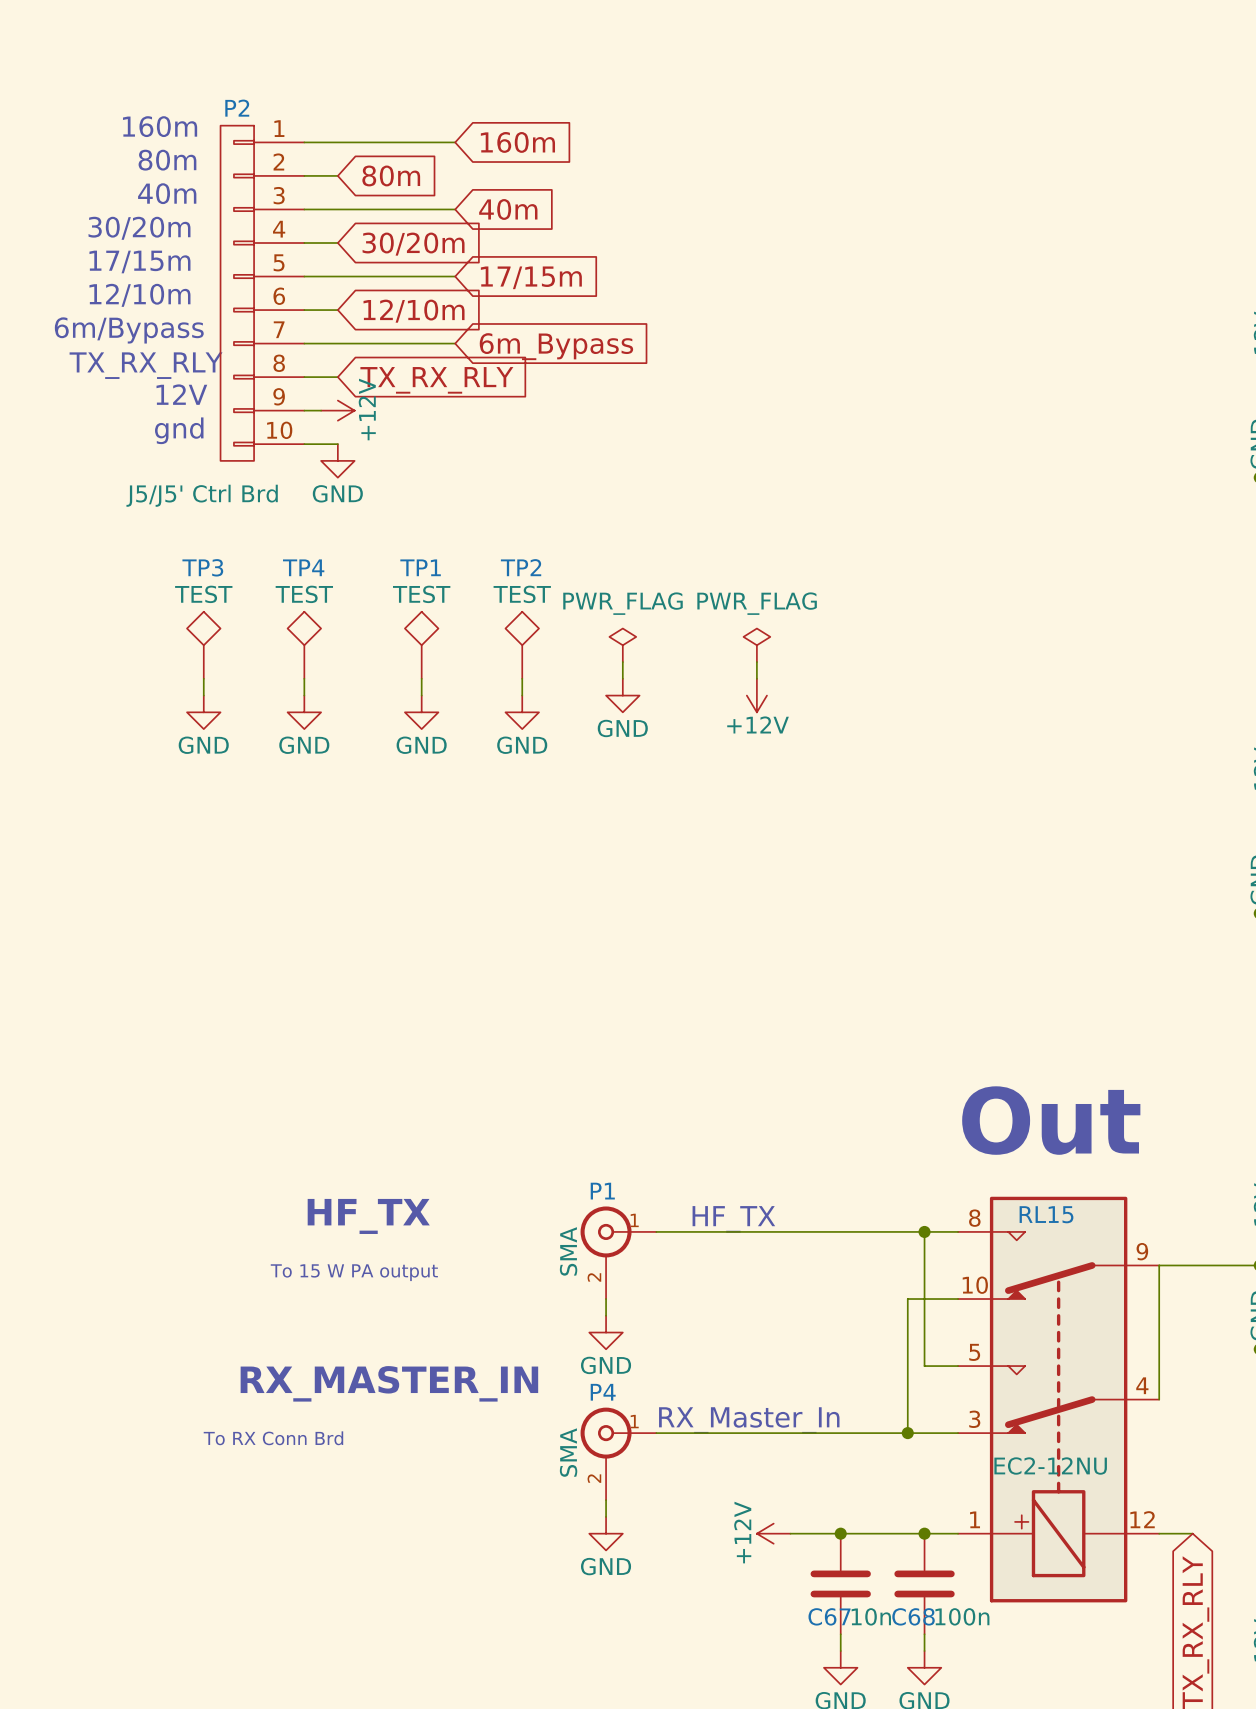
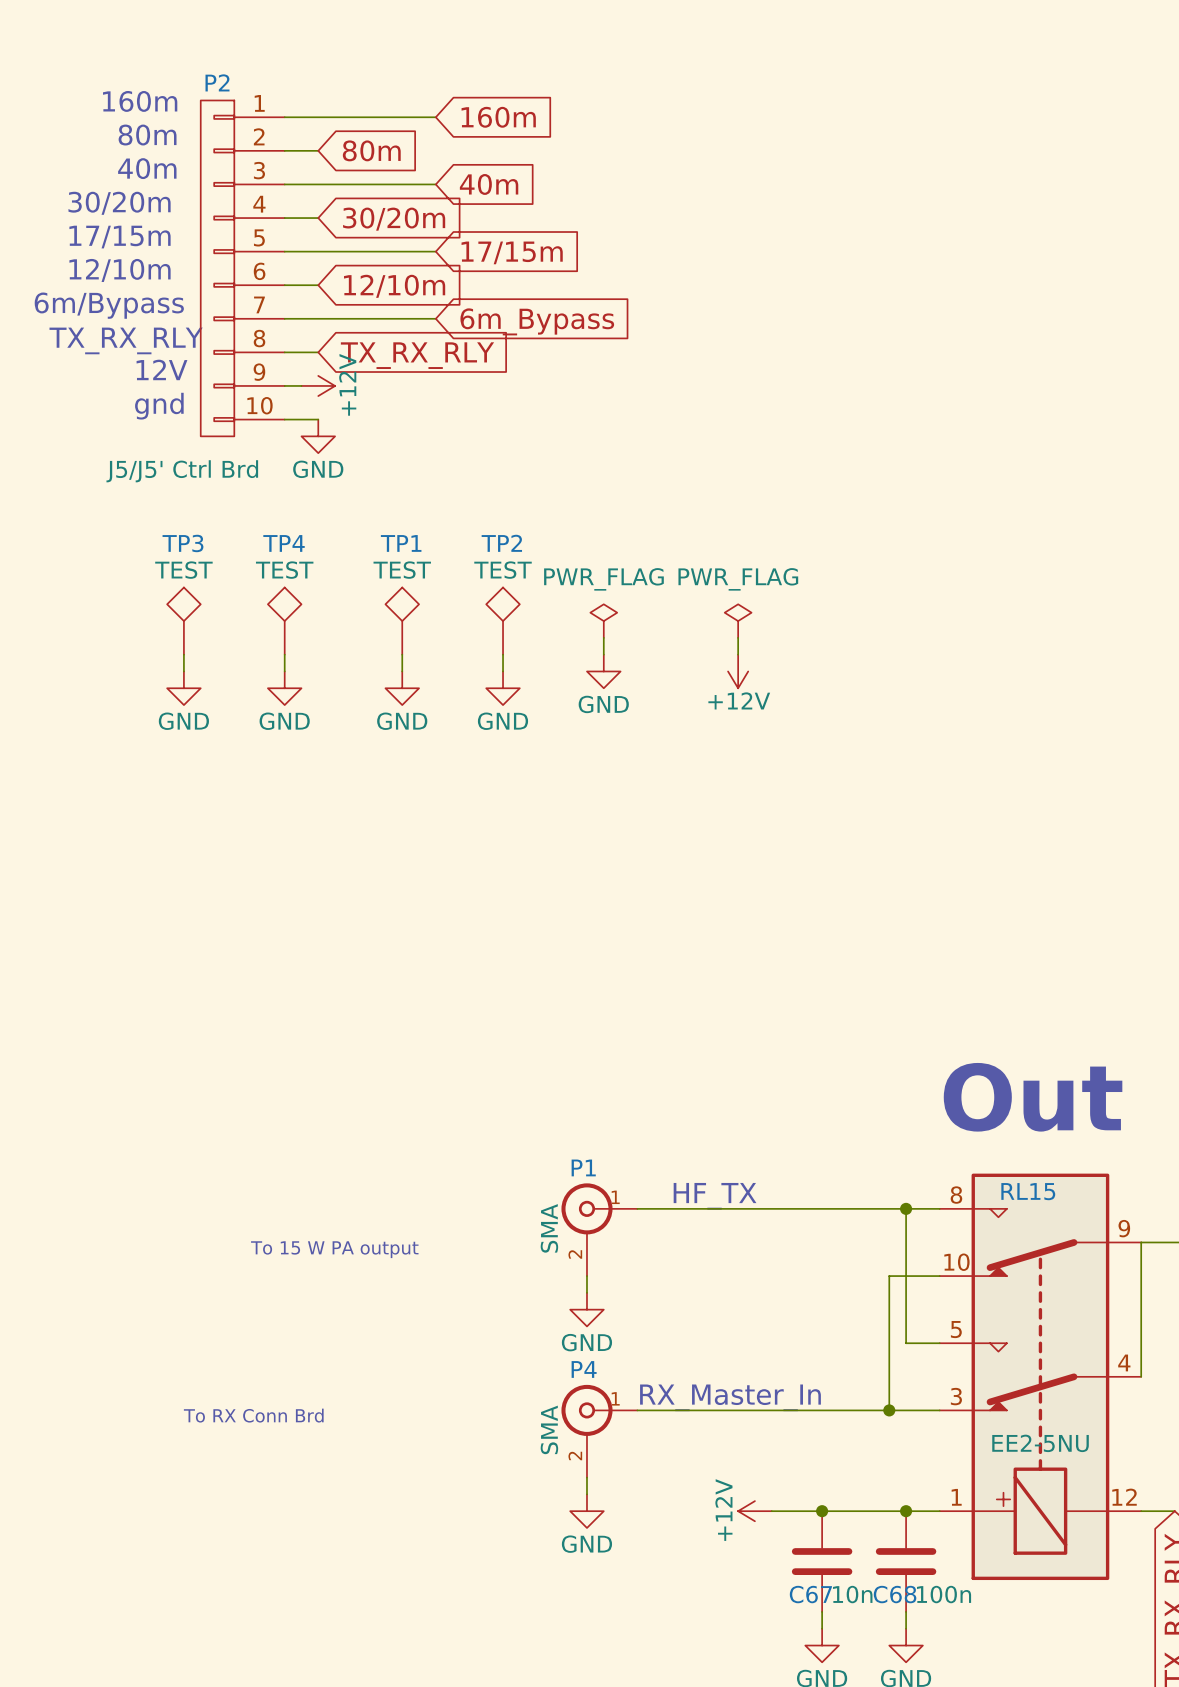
text: HF_TX (368, 1216) -> none
text: RX_MASTER_IN (389, 1383) -> none
RL15 value: EC2-12NU (1050, 1466) -> EE2-5NU (1040, 1443)

